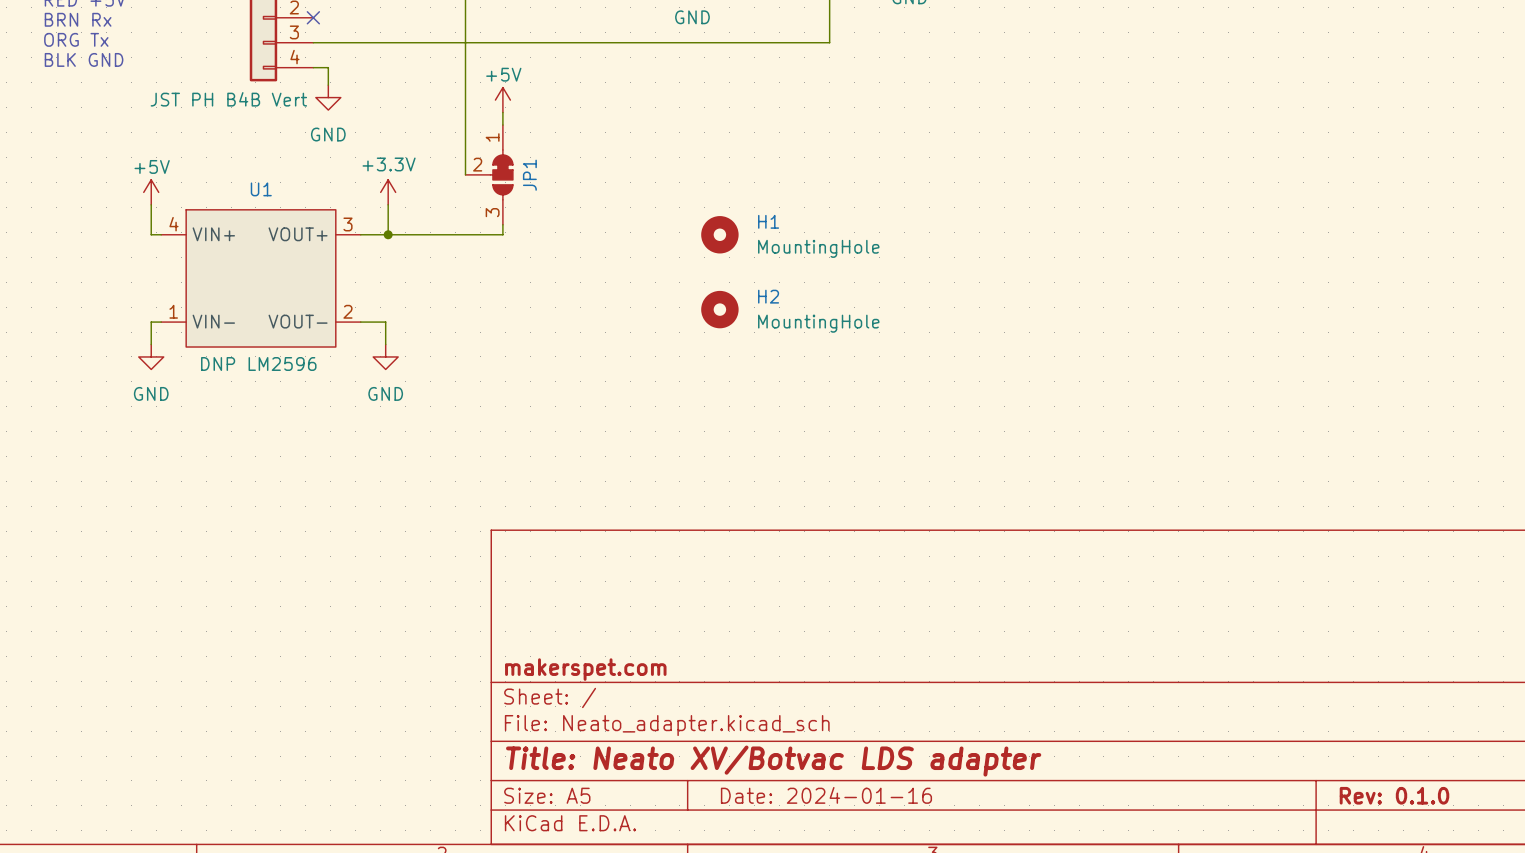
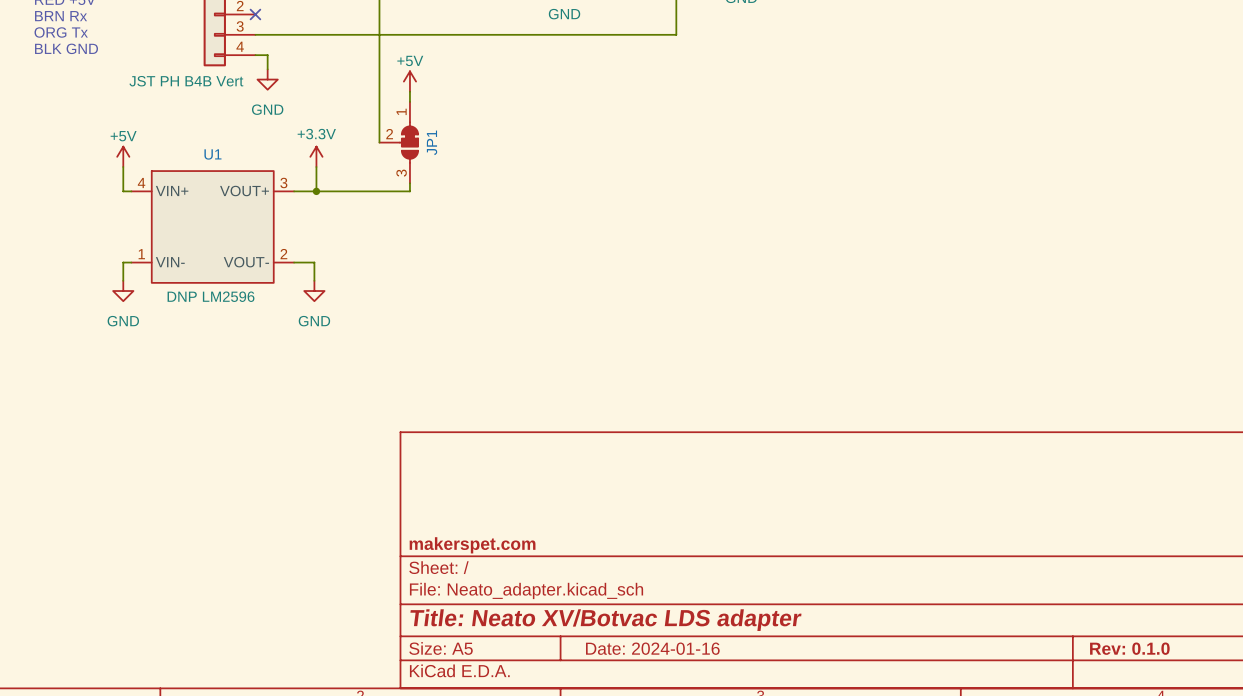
H1: MountingHole (719, 234) -> none
H2: MountingHole (719, 309) -> none

